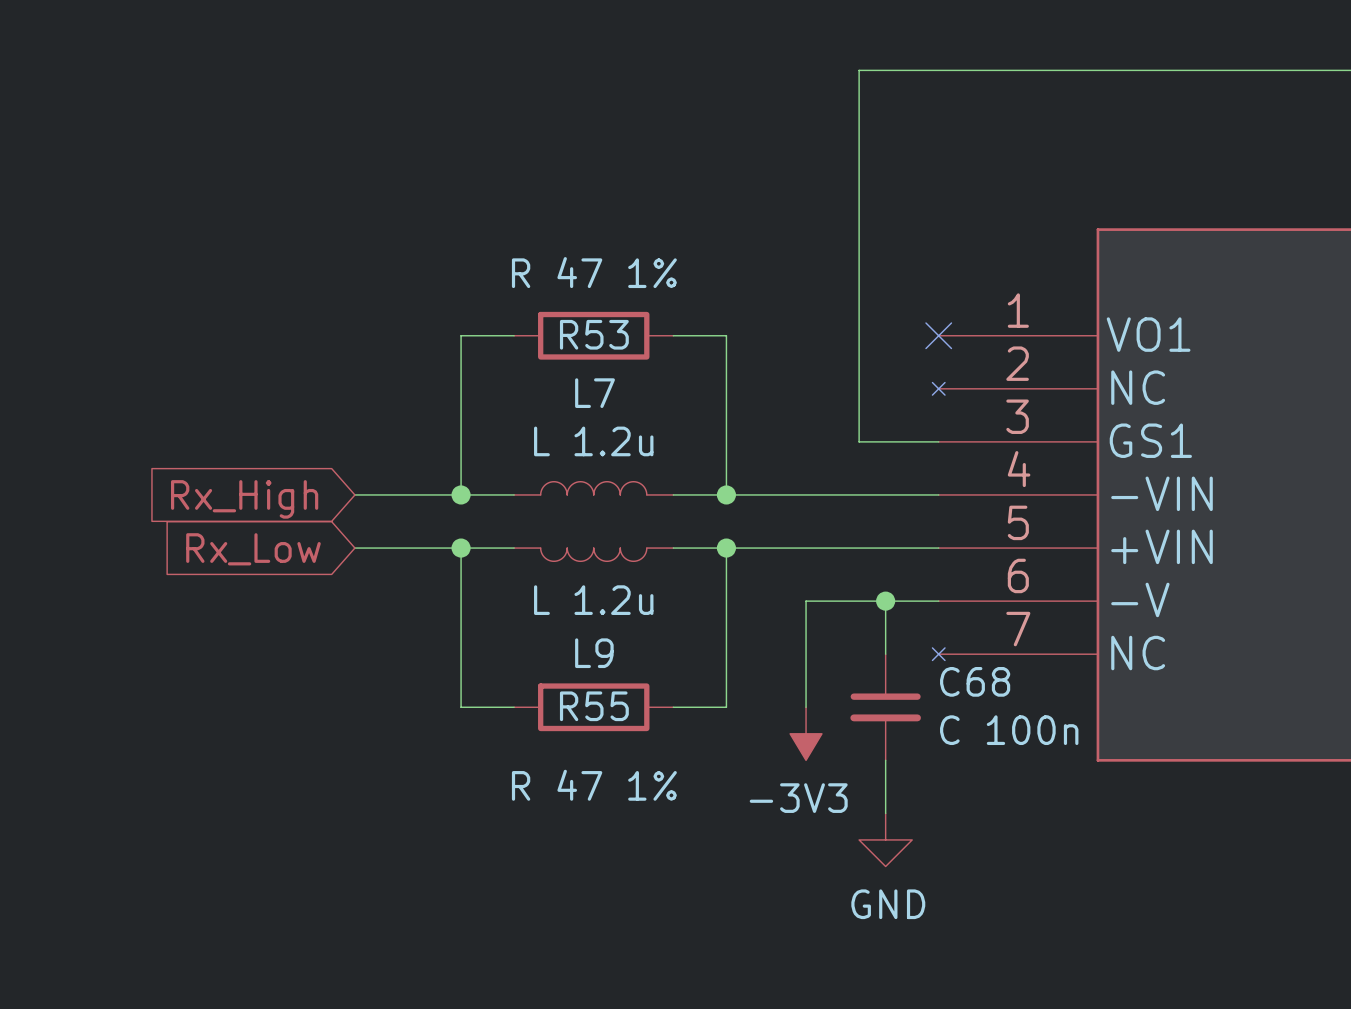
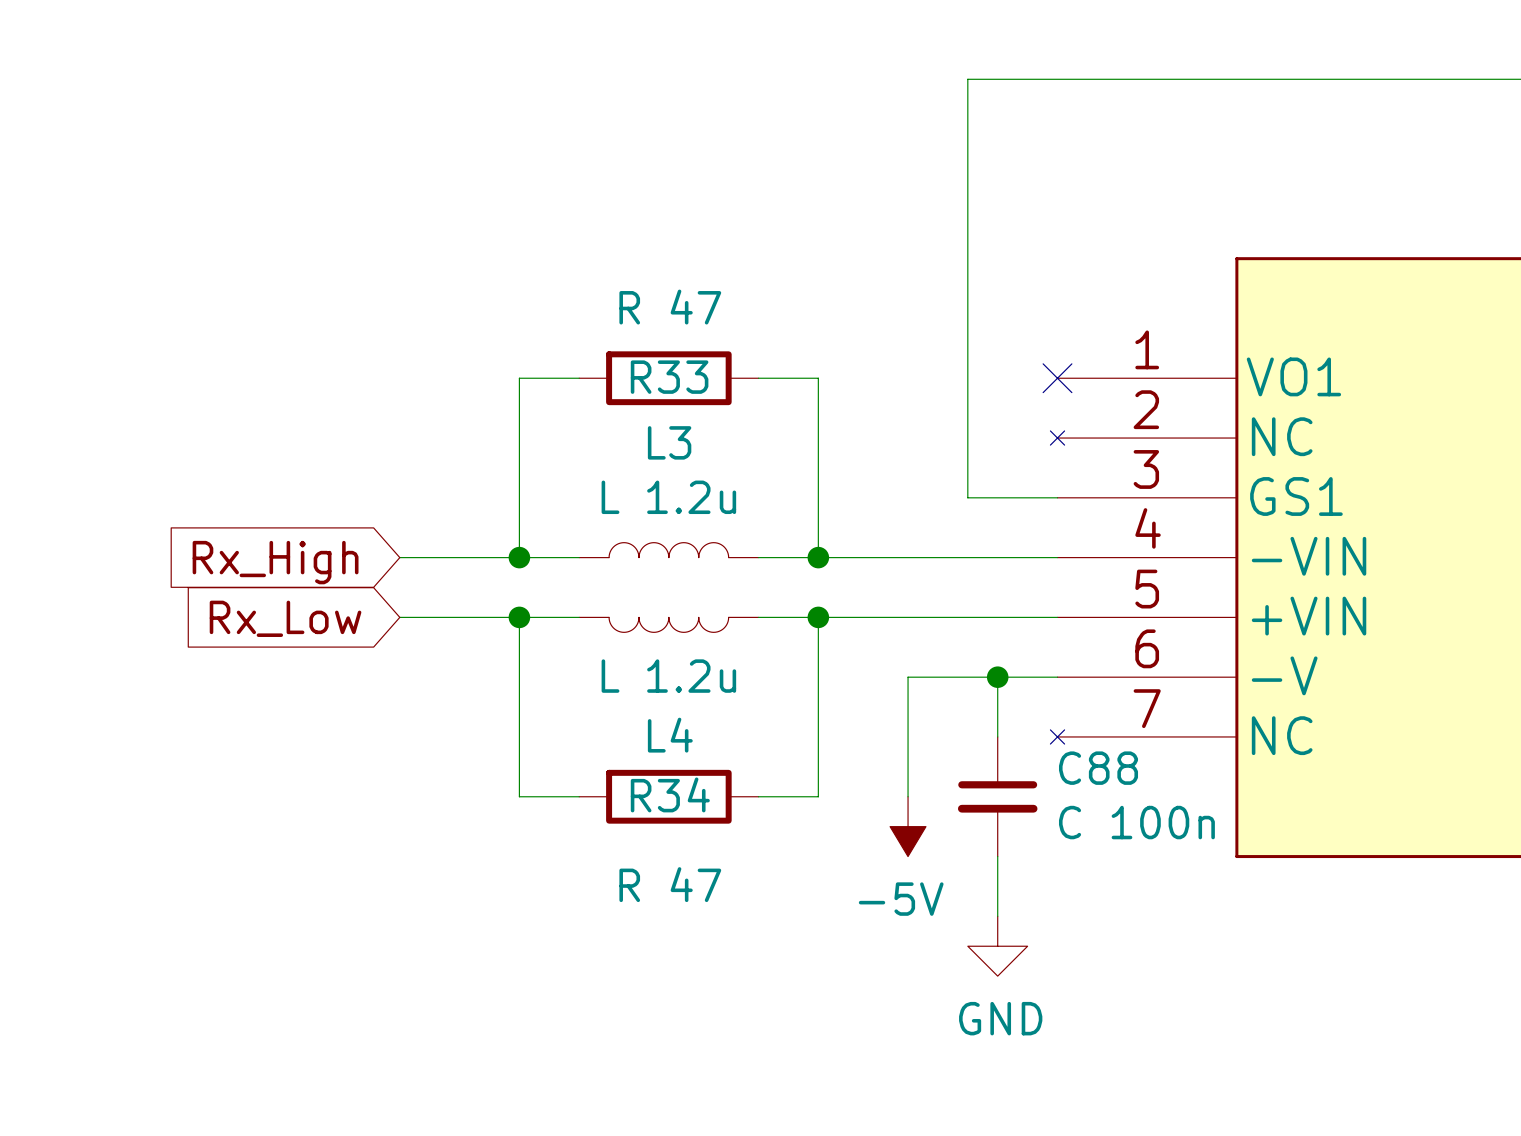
R53 value: R 47 1% (594, 272) -> R 47 (670, 307)
R53 name: R53 (594, 334) -> R33 (669, 377)
L7 name: L7 (595, 393) -> L3 (669, 442)
L9 name: L9 (594, 653) -> L4 (670, 735)
C68 name: C68 (975, 681) -> C88 (1098, 768)
R55 name: R55 (594, 706) -> R34 (670, 794)
power symbol: -3V3 (806, 733) -> -5V (908, 826)
R55 value: R 47 1% (594, 785) -> R 47 (670, 884)

